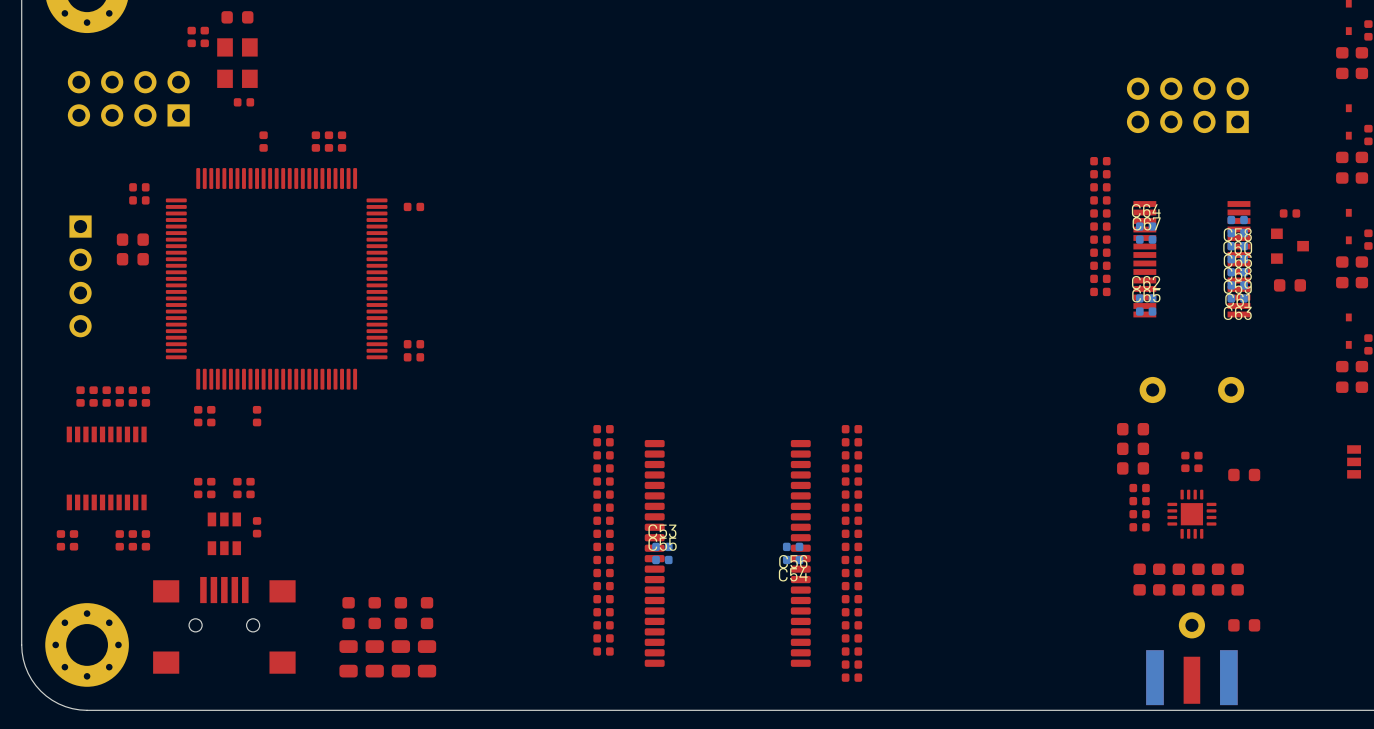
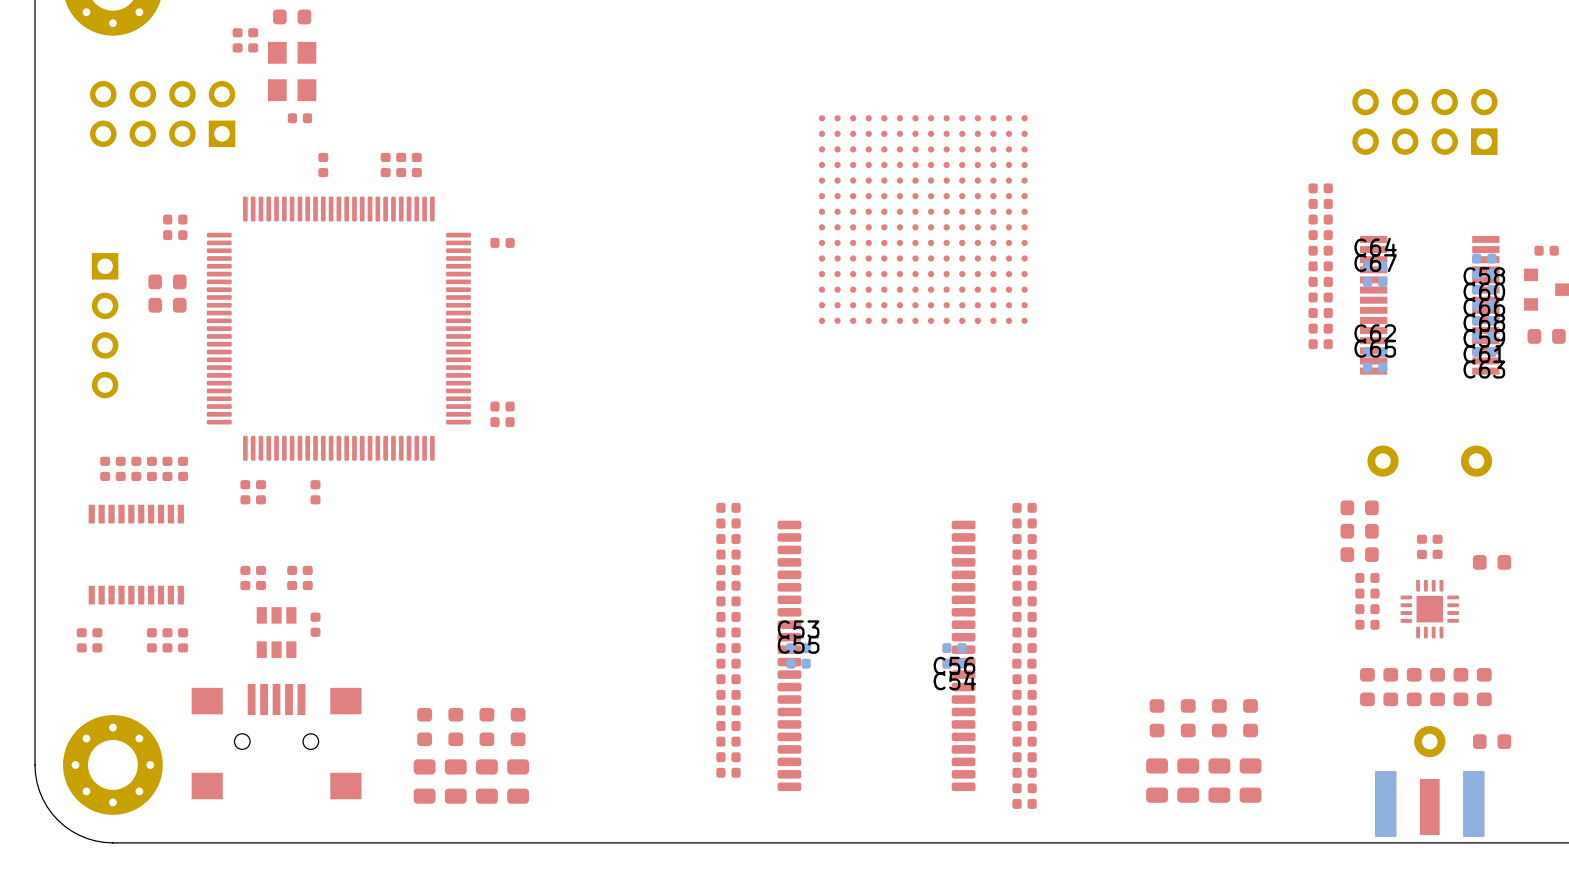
part: none -> (923, 219)
part: none -> (1157, 718)
part: none -> (1188, 718)
part: none -> (1219, 718)
part: none -> (1250, 718)
part: none -> (1157, 780)
part: none -> (1188, 780)
part: none -> (1219, 780)
part: none -> (1250, 780)

